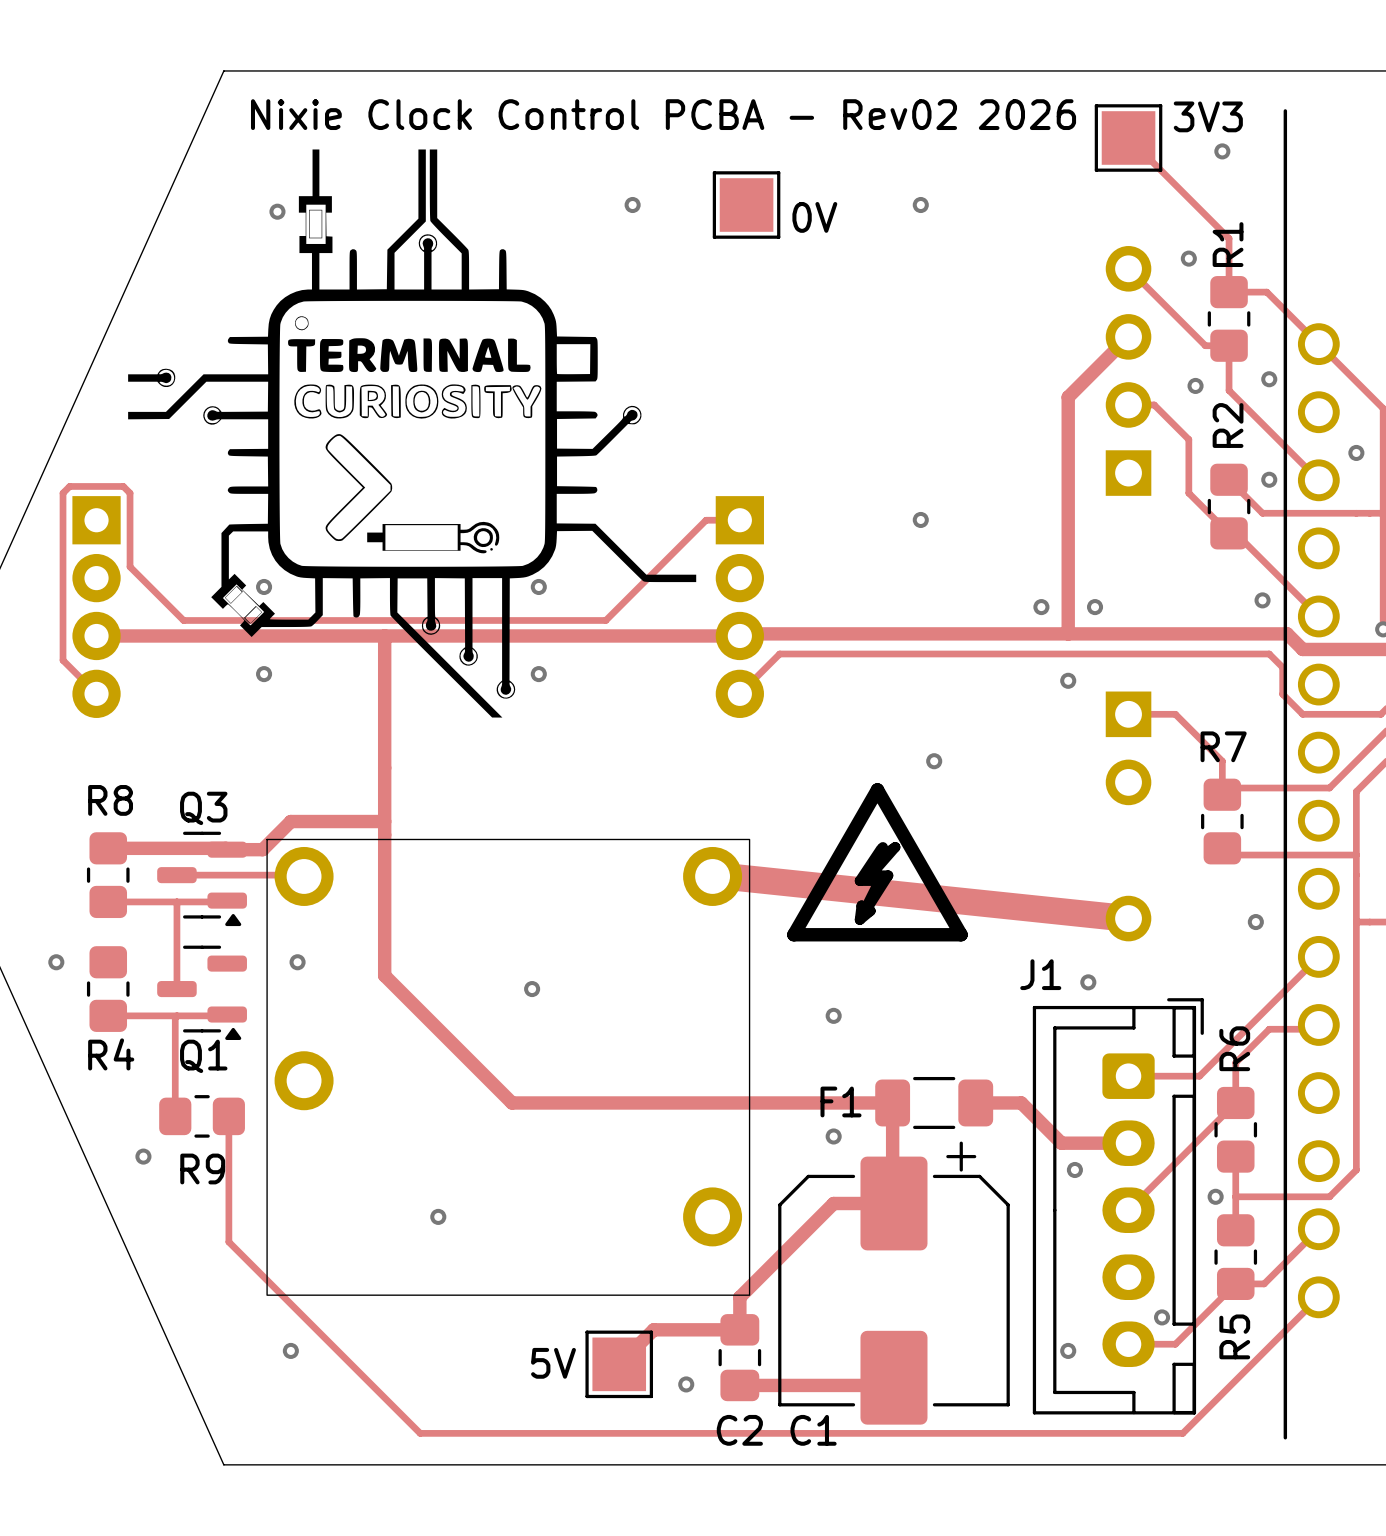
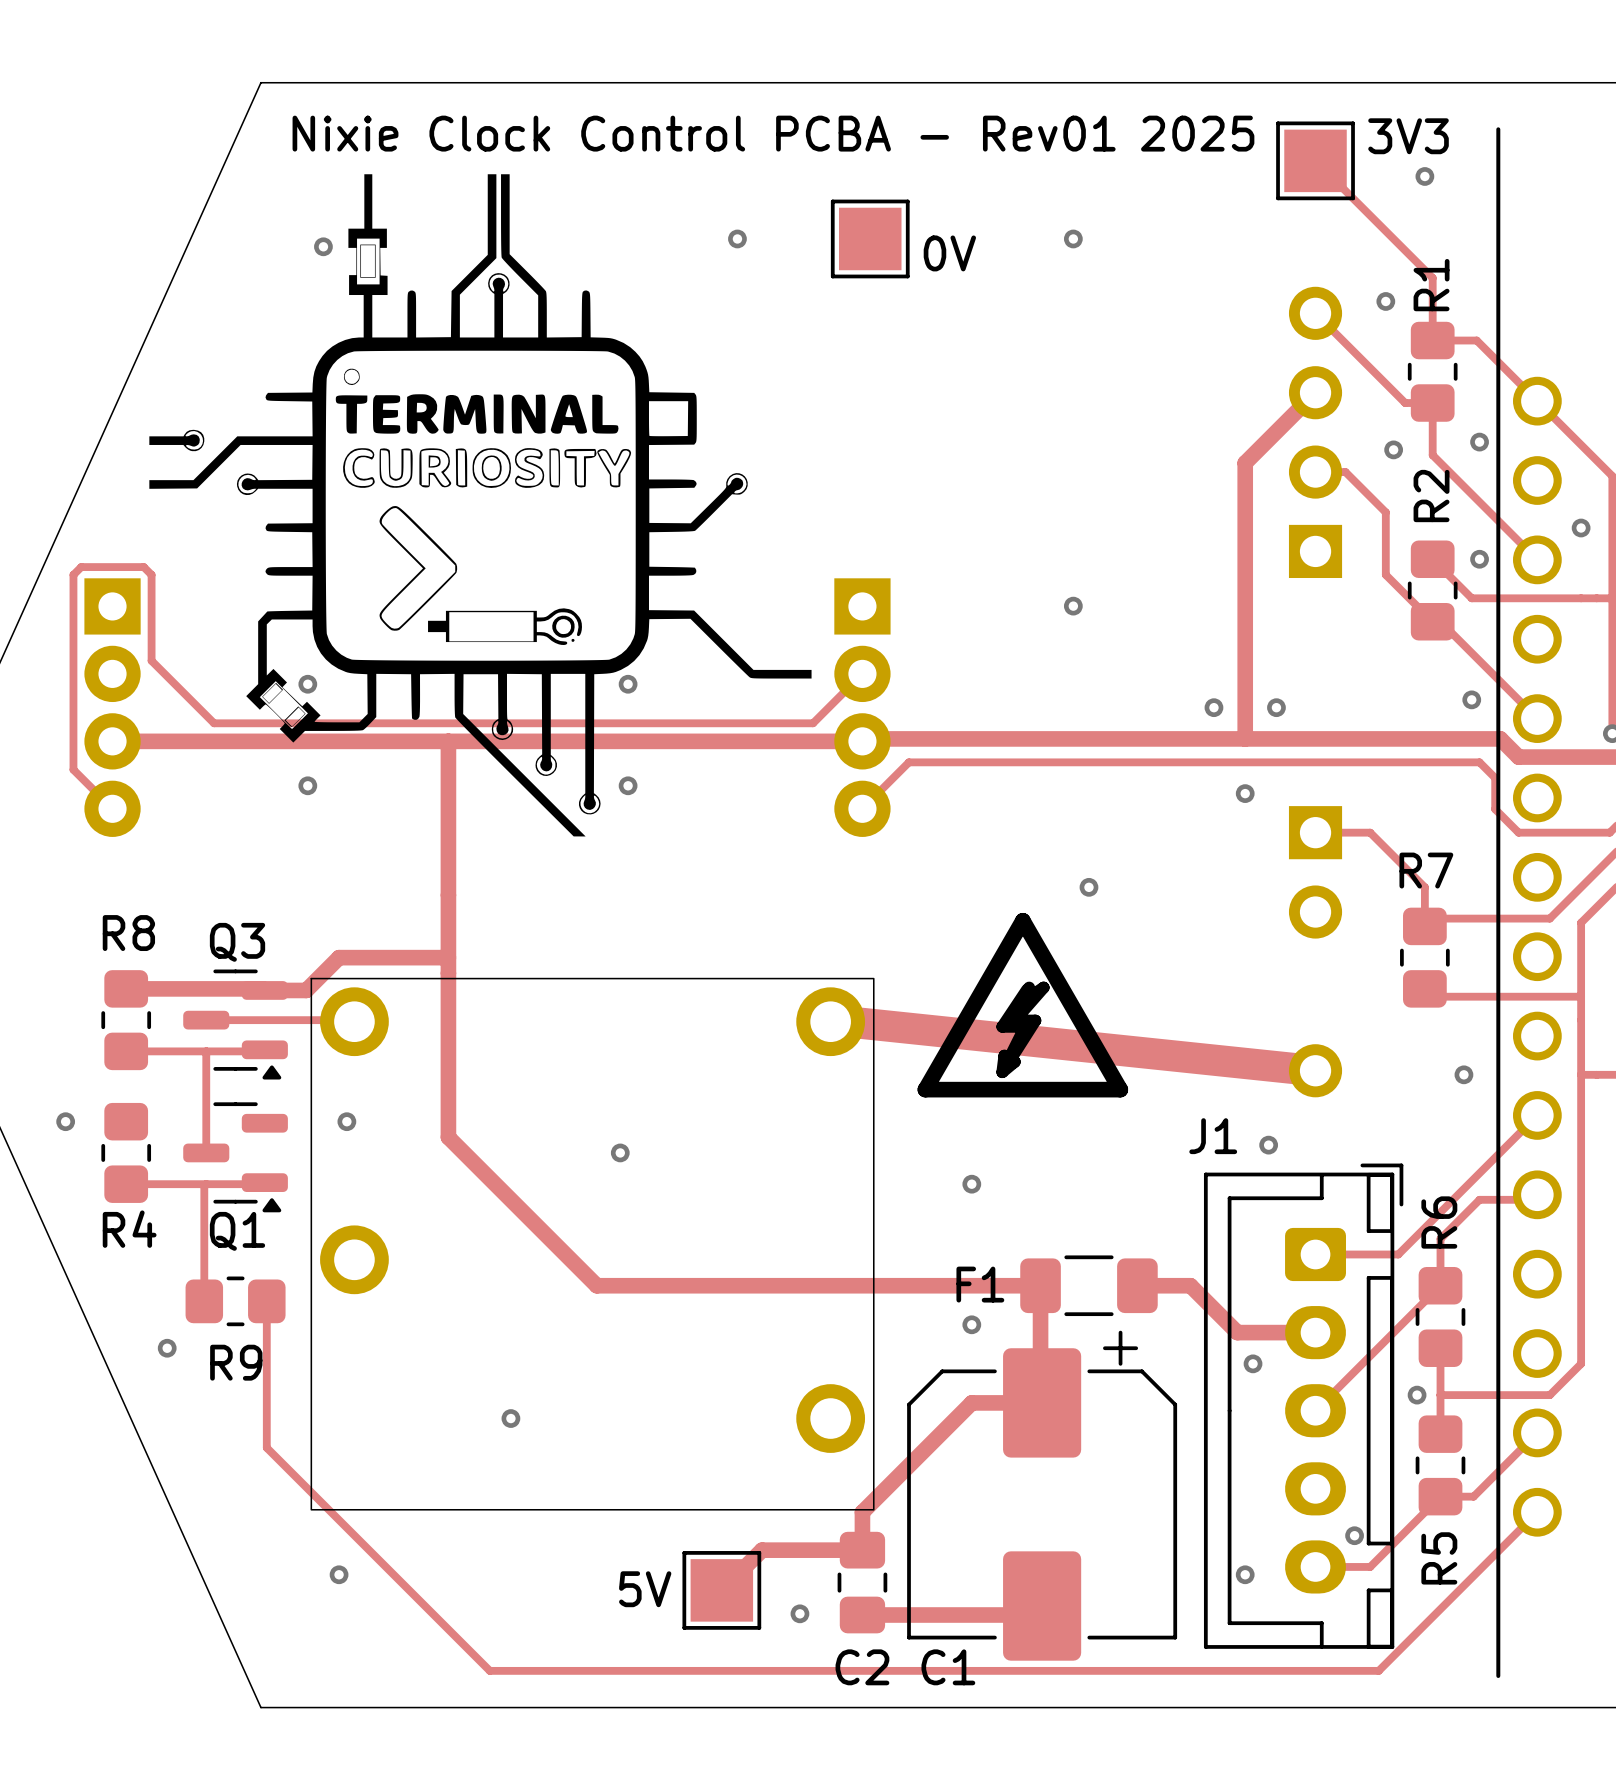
text: Nixie Clock Control PCBA - Rev02 (604, 114) -> Nixie Clock Control PCBA - Rev01 (704, 133)
text: 2026 (1027, 114) -> 2025 (1197, 133)
track: (739, 520) (706, 520) (605, 620) -> (862, 673) (813, 723) (706, 723)

